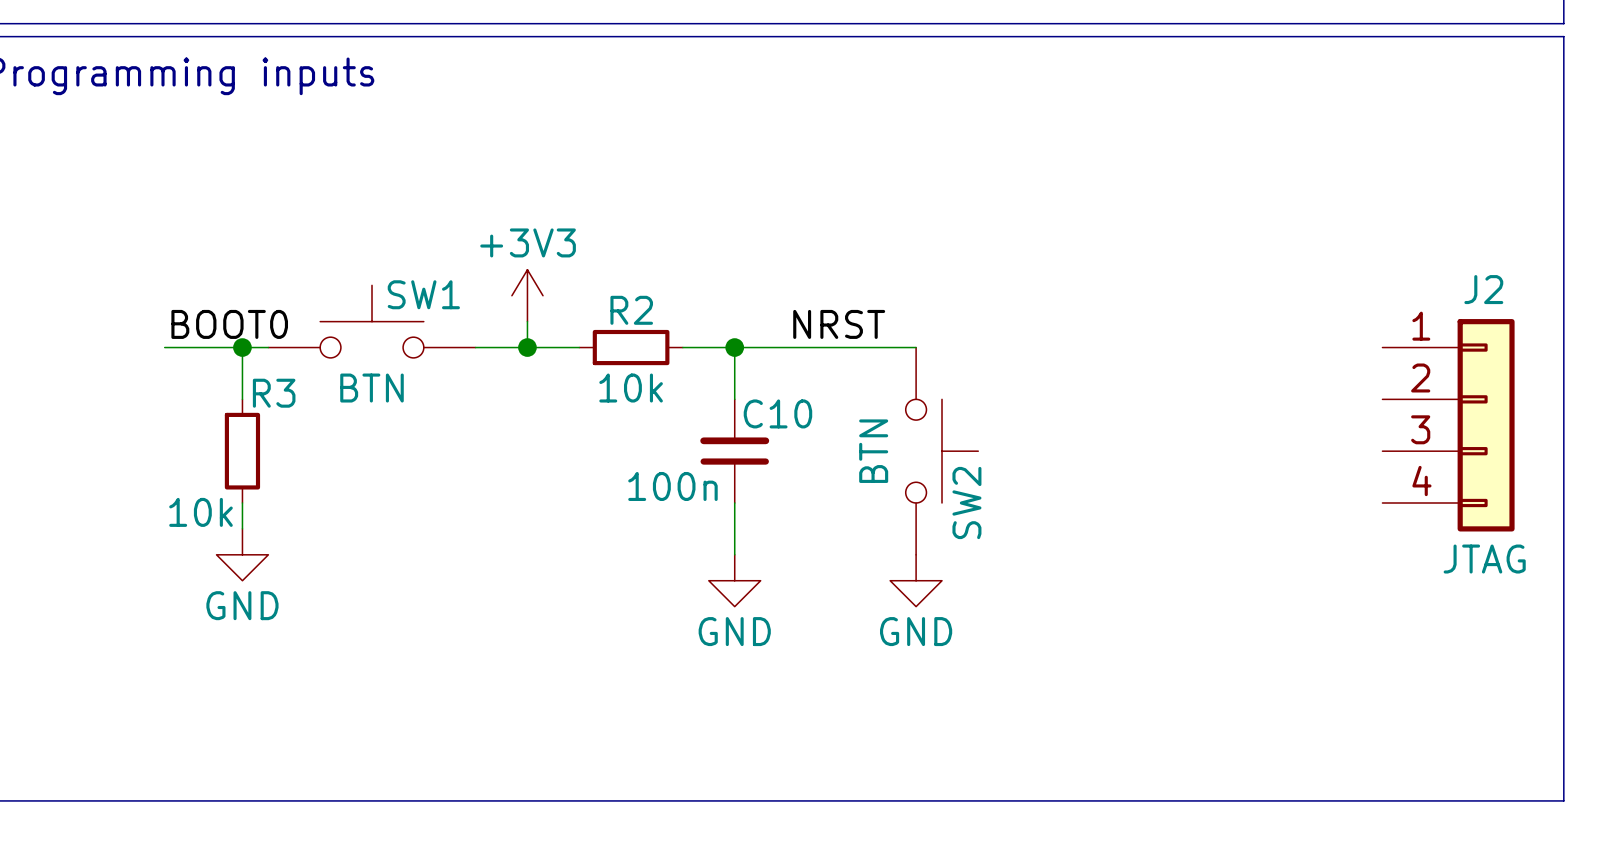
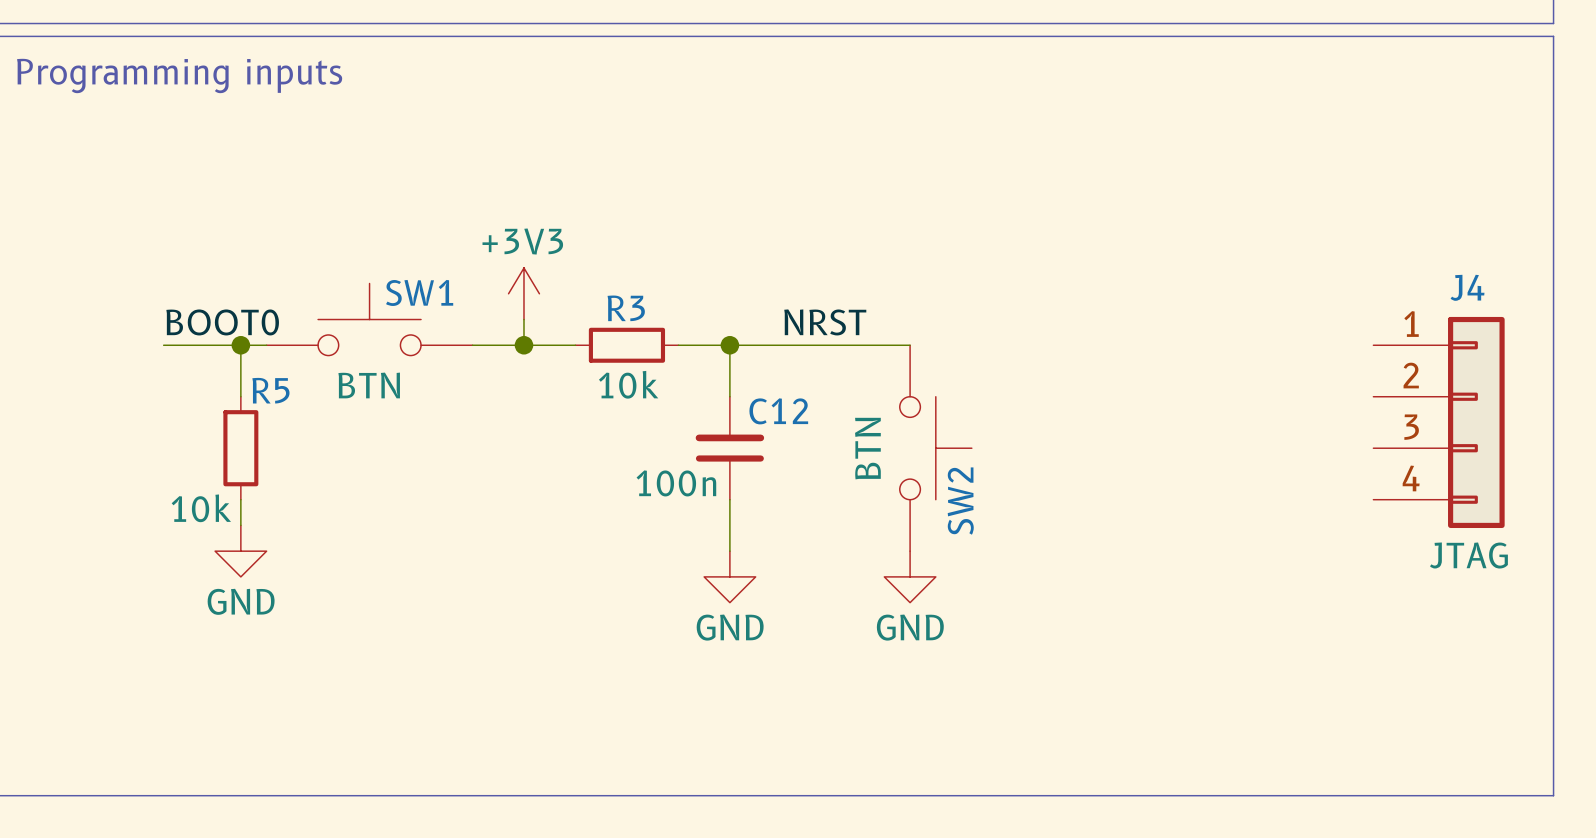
J2 name: J2 (1483, 289) -> J4 (1467, 287)
R2 name: R2 (631, 310) -> R3 (626, 308)
R3 name: R3 (274, 393) -> R5 (270, 390)
C10 name: C10 (777, 413) -> C12 (778, 411)

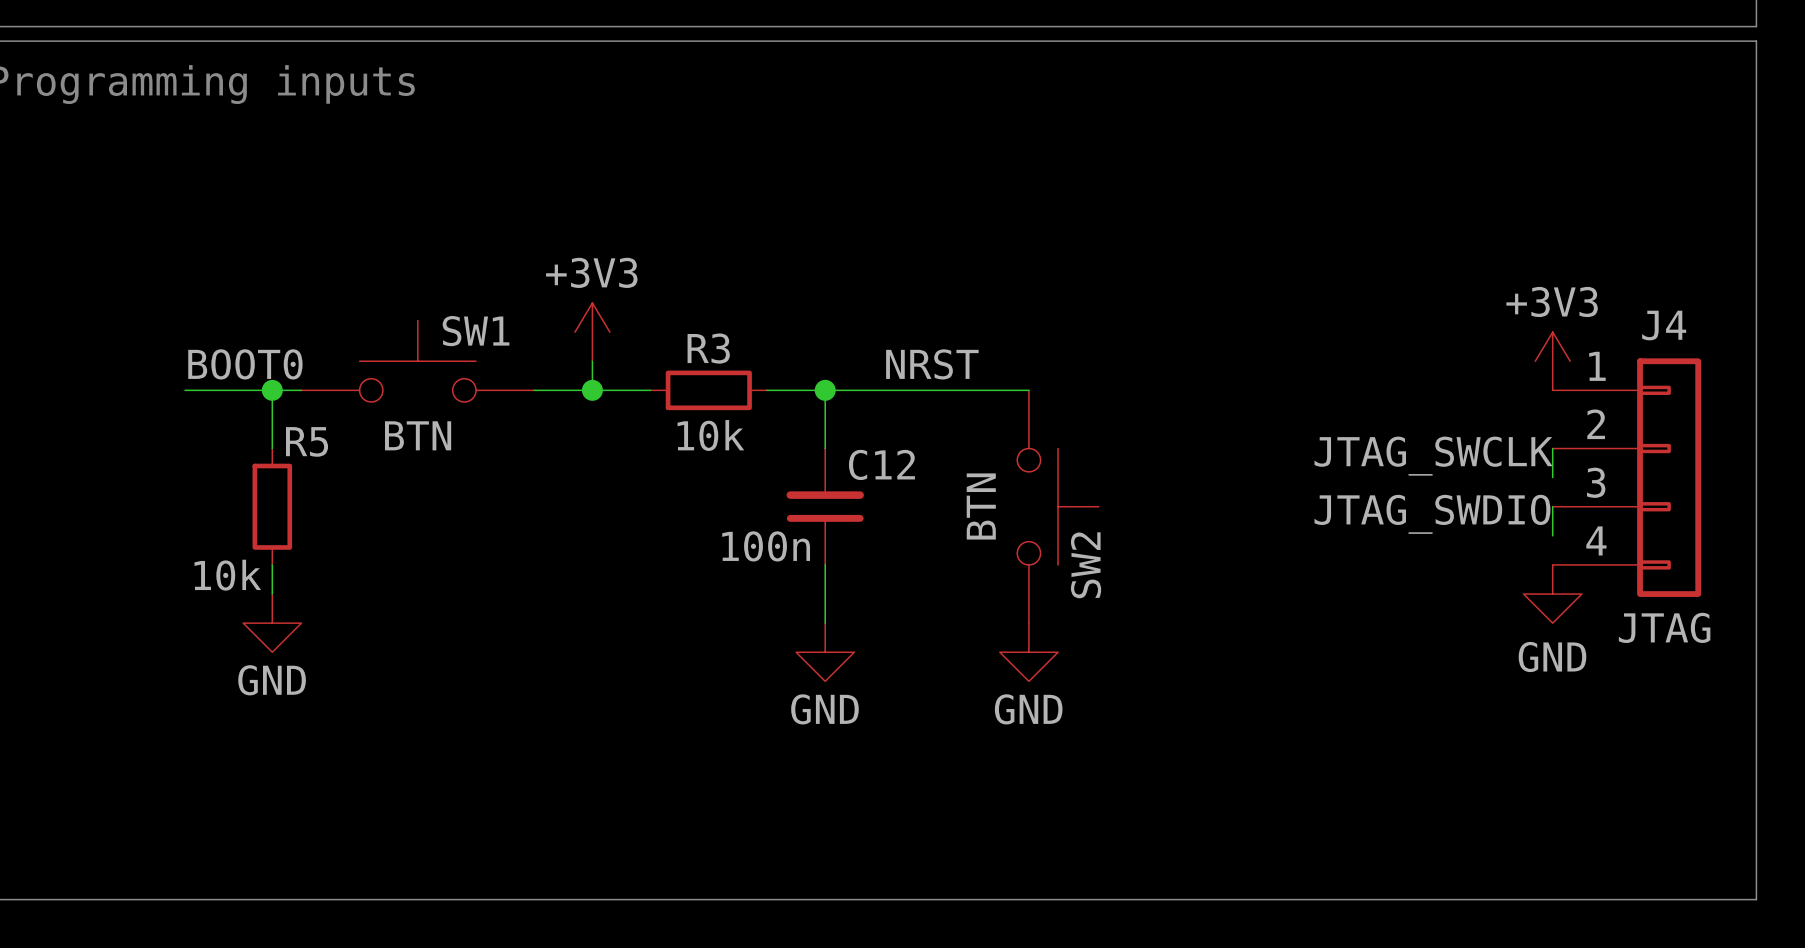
power symbol: none -> +3V3 (1552, 361)
wire: none -> (1552, 448) (1552, 477)
label: none -> JTAG_SWCLK (1433, 456)
wire: none -> (1552, 506) (1552, 535)
label: none -> JTAG_SWDIO (1432, 514)
power symbol: none -> GND (1552, 594)

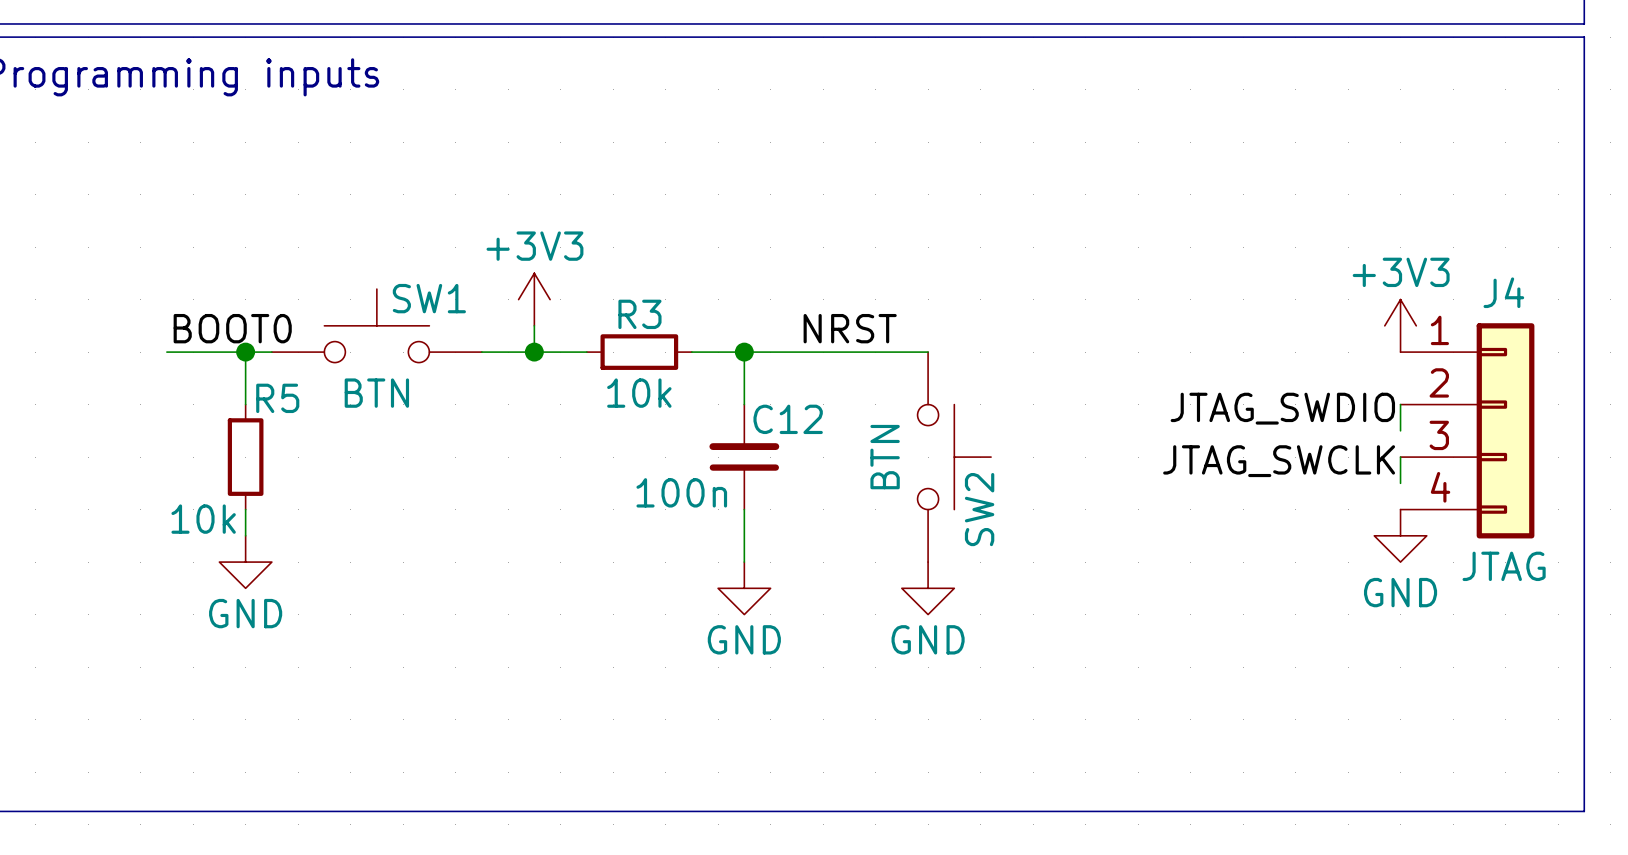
label: JTAG_SWCLK (1433, 456) -> JTAG_SWDIO (1282, 408)
label: JTAG_SWDIO (1432, 514) -> JTAG_SWCLK (1279, 461)

